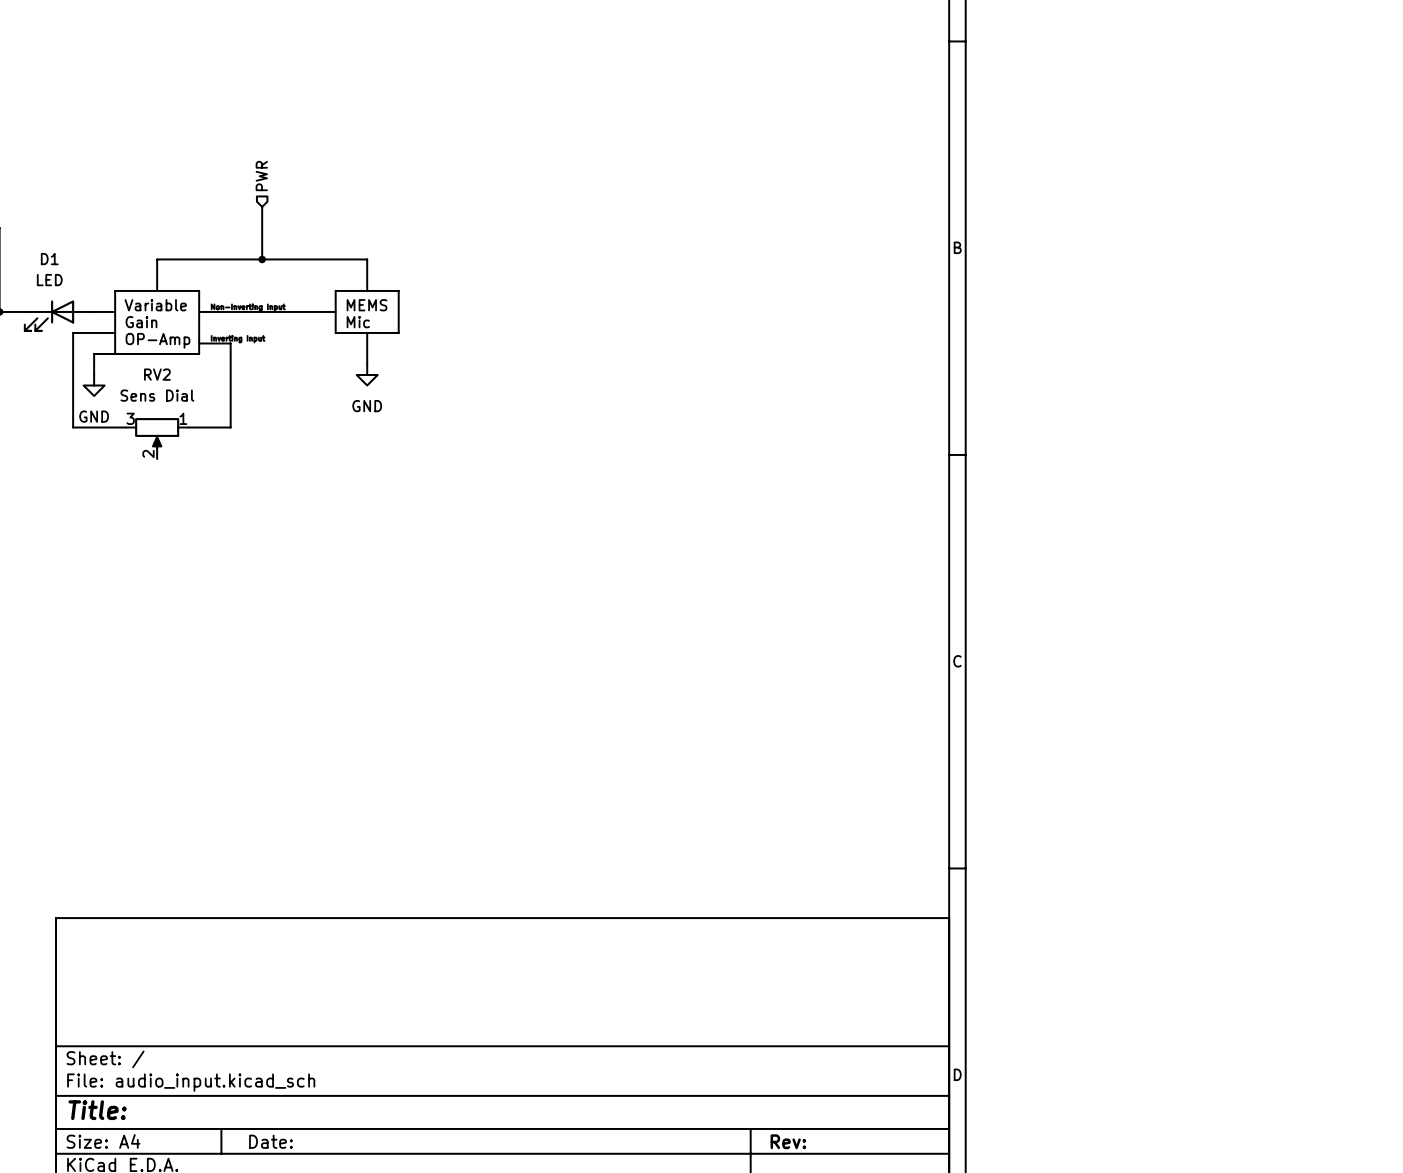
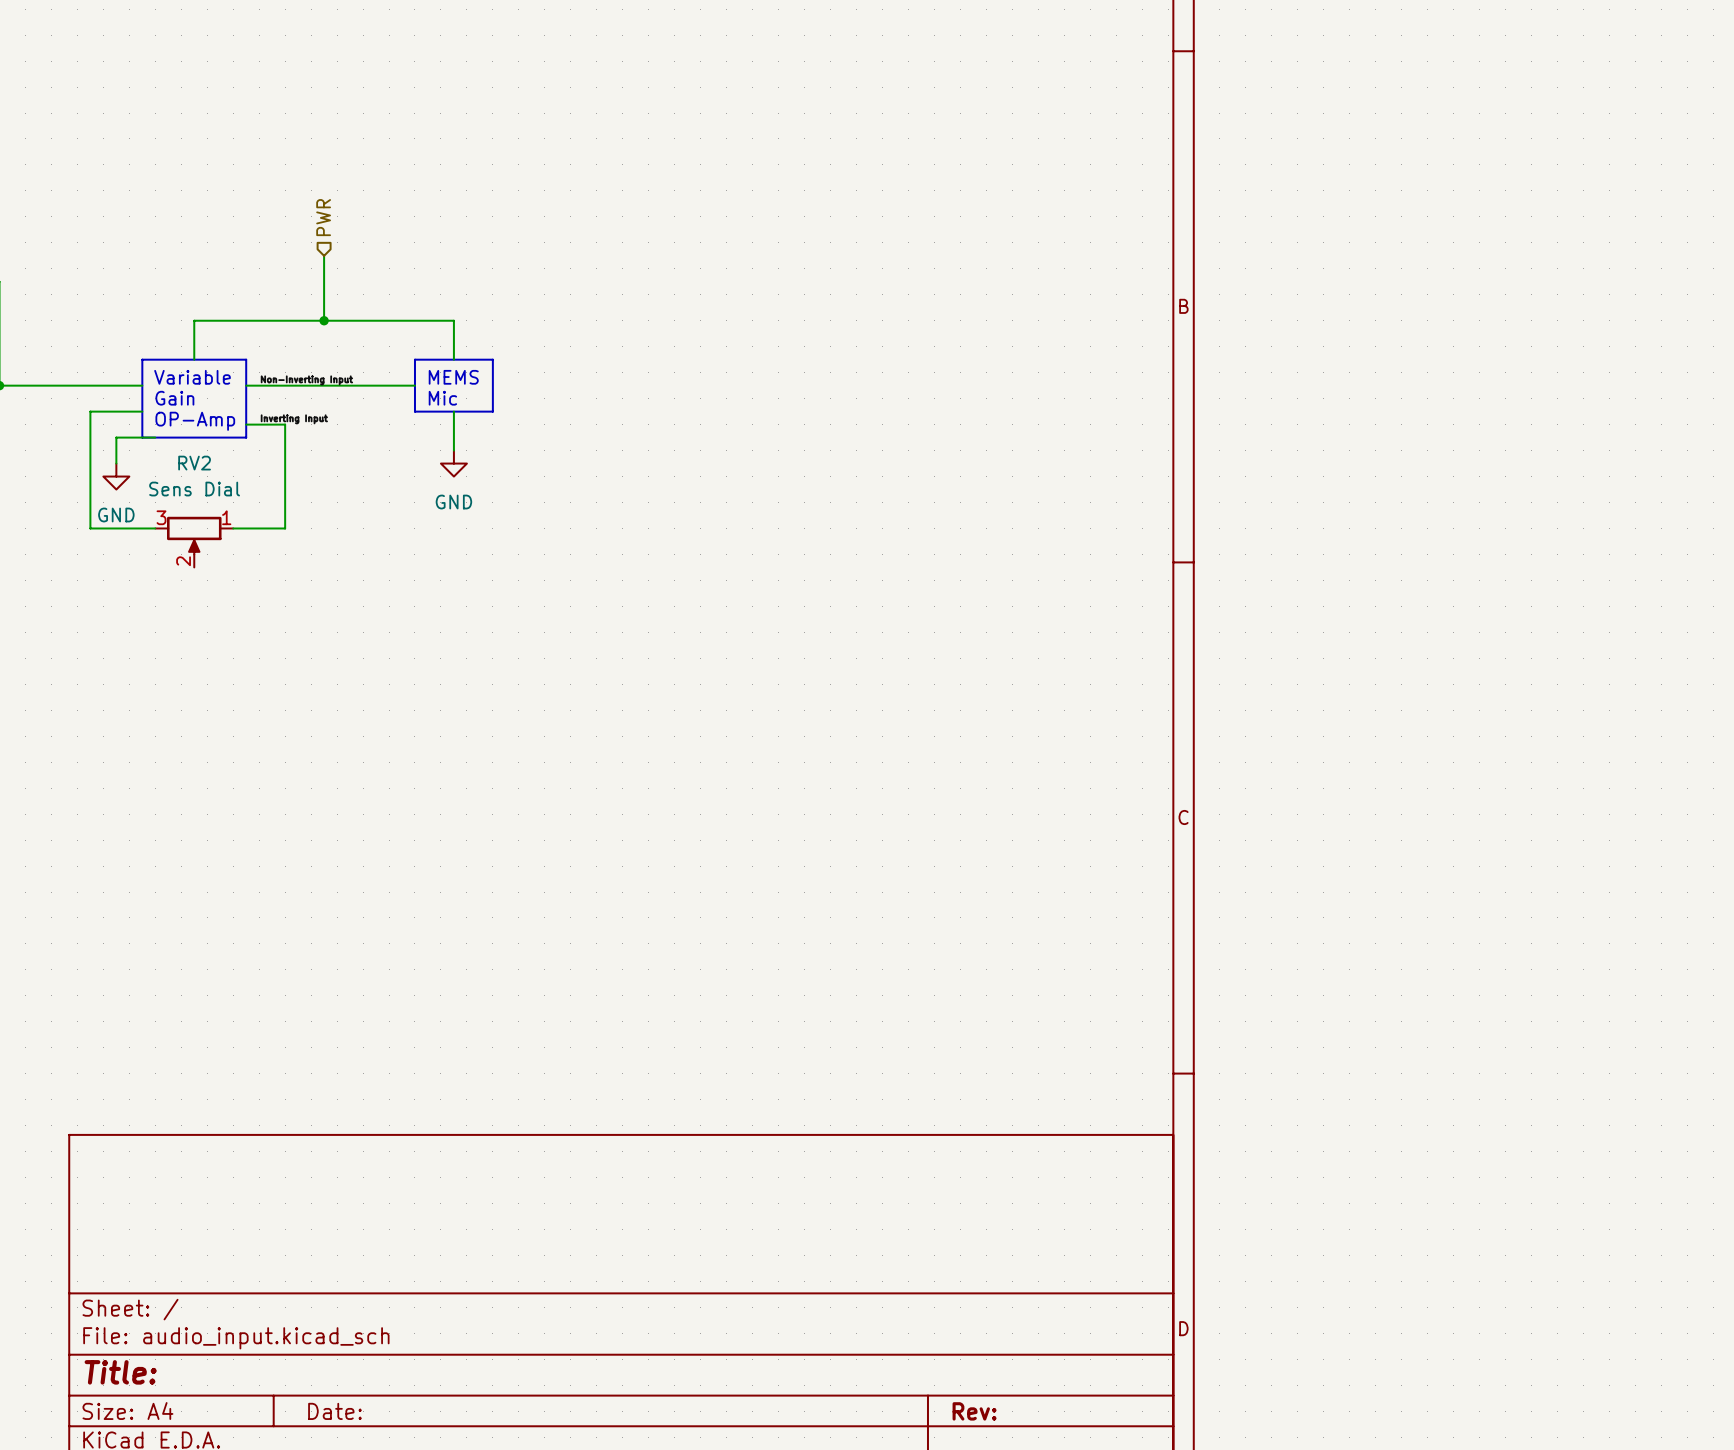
D1: LED (59, 315) -> none

